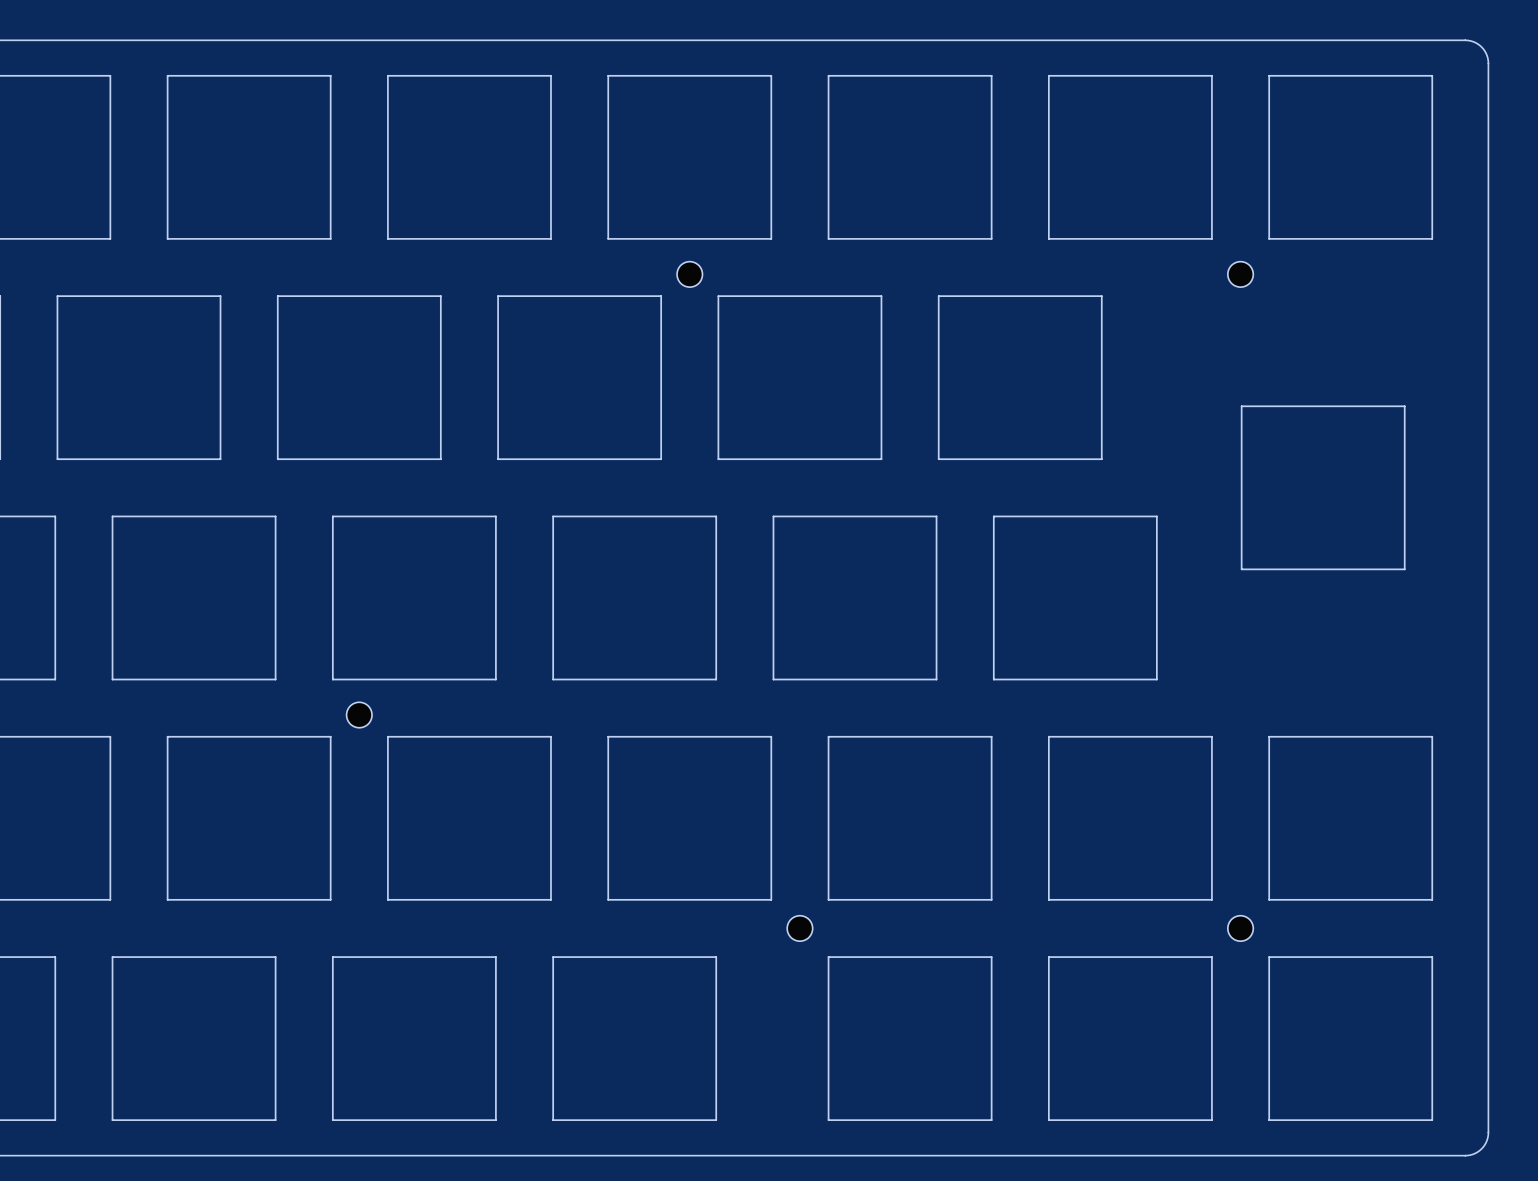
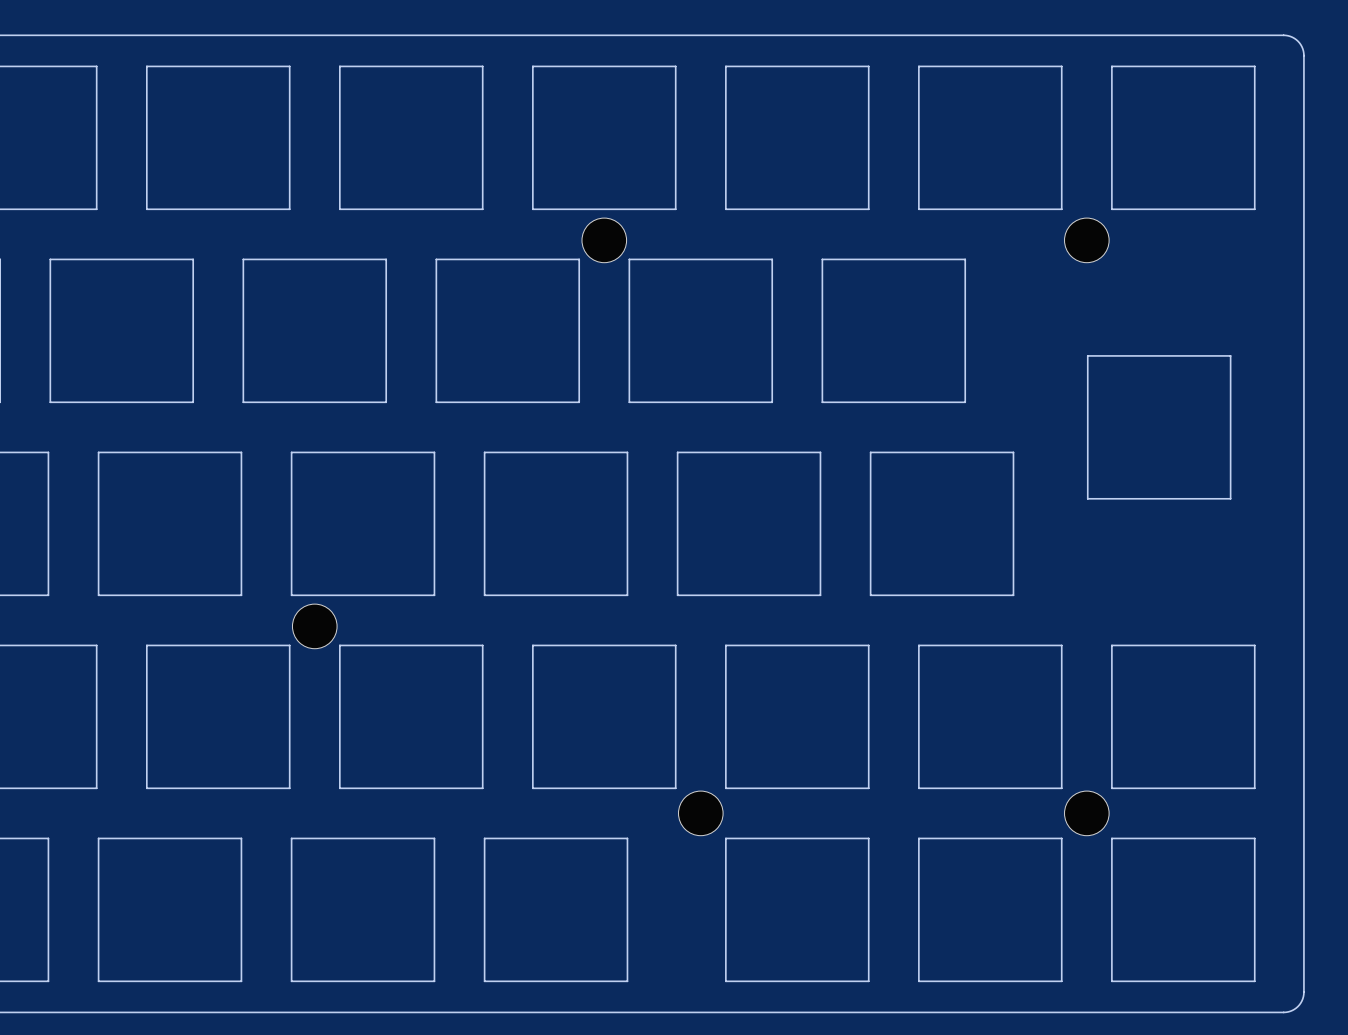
part footprint: [677, 261, 703, 288] -> [581, 217, 628, 264]
part footprint: [1227, 261, 1254, 288] -> [1064, 217, 1110, 264]
part footprint: [346, 702, 373, 728] -> [291, 603, 338, 650]
part footprint: [787, 915, 813, 942] -> [677, 790, 724, 837]
part footprint: [1227, 915, 1254, 942] -> [1064, 790, 1110, 837]

